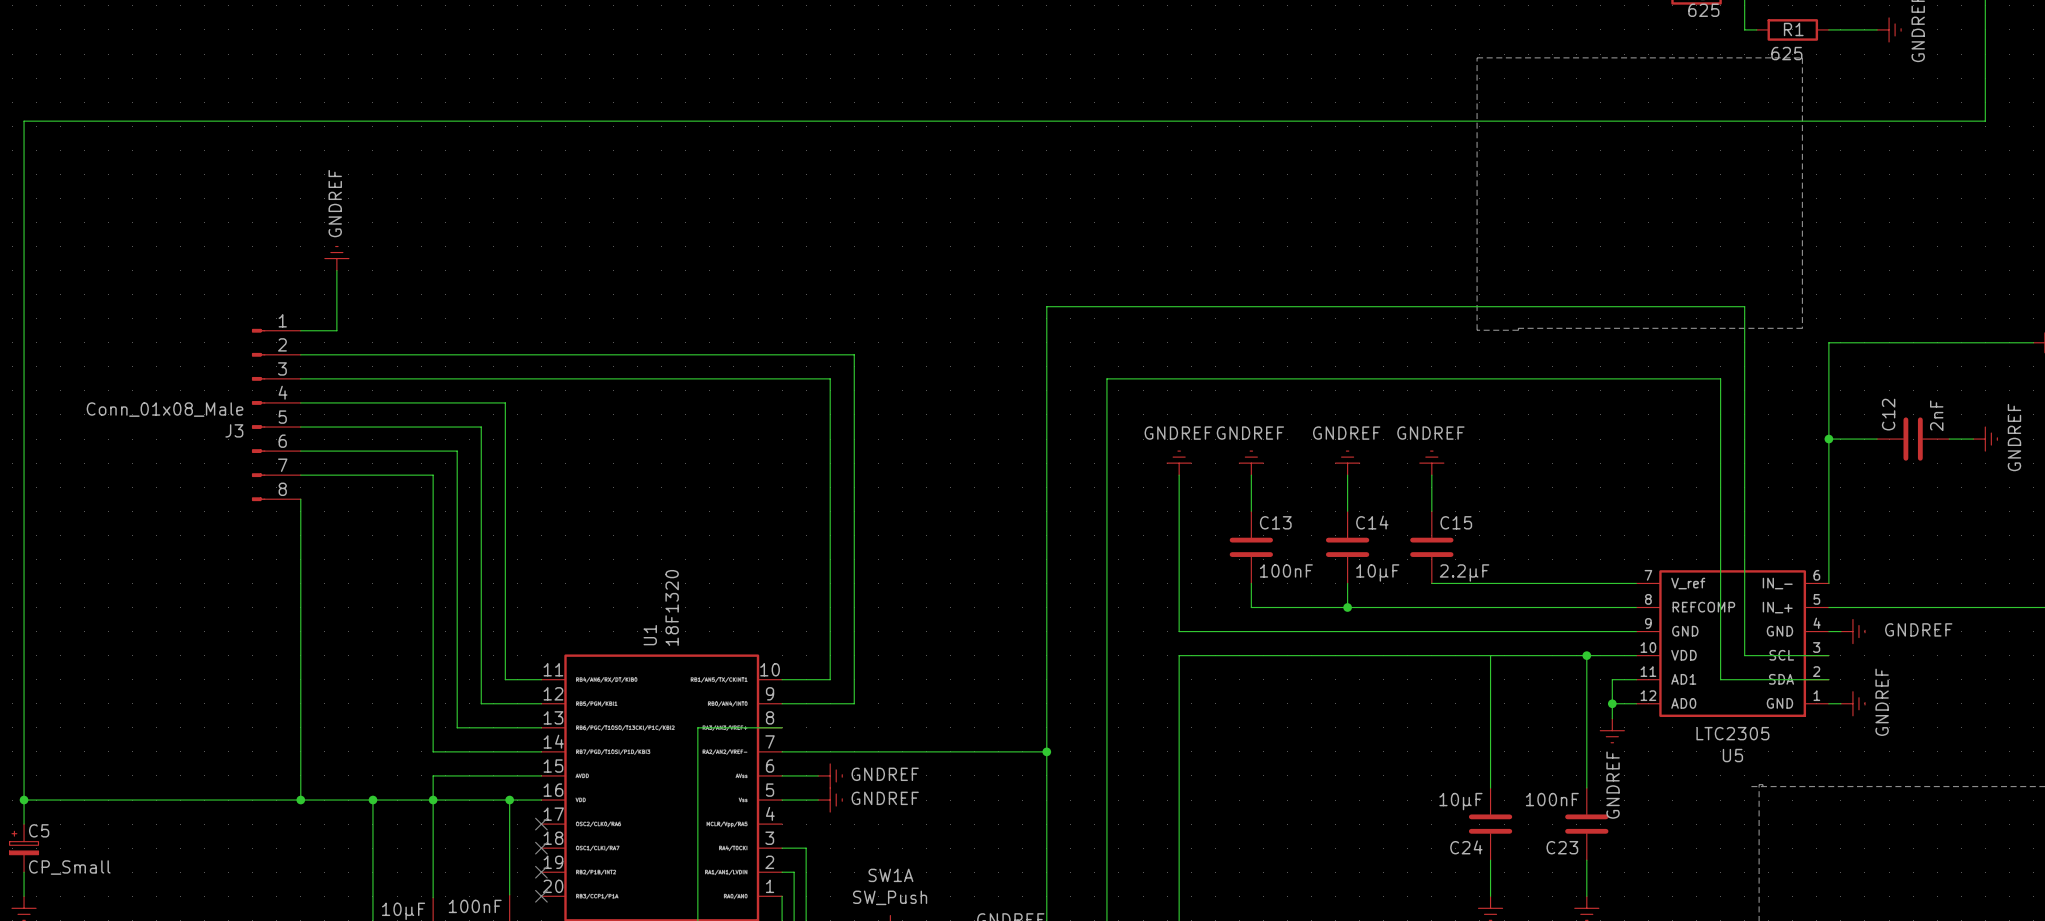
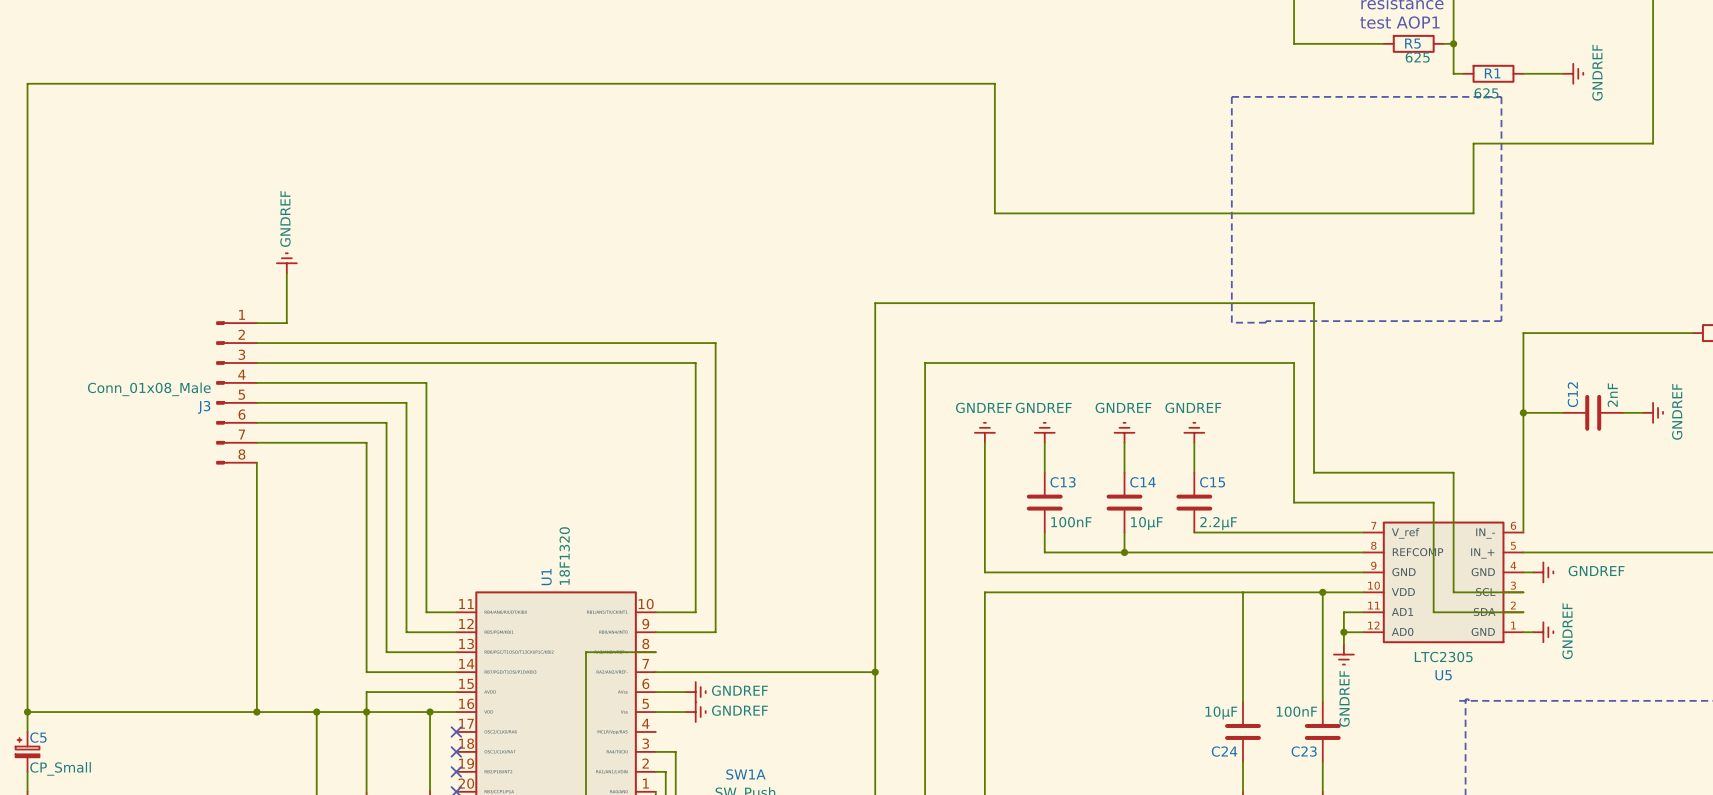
wire: (1985, 114) (1985, 121) (24, 121) -> (1653, 143) (1473, 143) (1473, 213) (994, 213) (994, 83) (27, 83) (27, 149)
wire: (1576, 306) (1744, 306) (1744, 511) -> (1313, 303) (1313, 472) (1453, 472)
wire: (1552, 378) (1720, 378) (1720, 547) -> (1294, 362) (1294, 502) (1433, 502)

